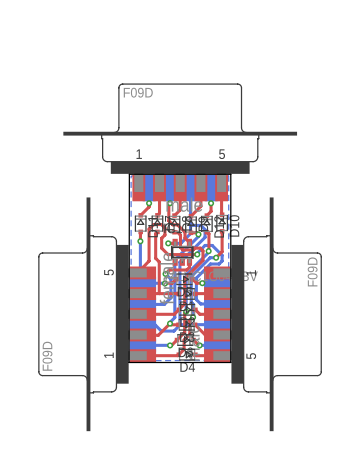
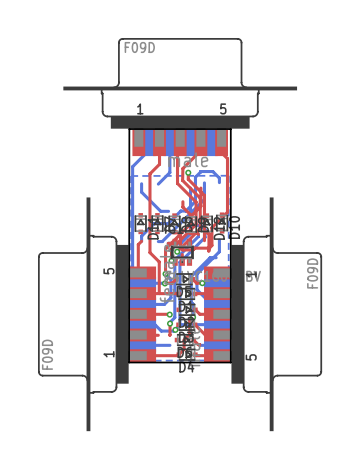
bottom track: none -> (169, 142) (169, 172) (158, 184)
top track: none -> (180, 142) (177, 145) (177, 183) (196, 202) (196, 224) (171, 249) (171, 260)
part position: (180, 142) -> (180, 97)
top track: none -> (200, 142) (198, 152) (182, 168) (182, 180) (200, 198) (200, 228) (177, 251)
top track: none -> (188, 172) (188, 179) (204, 195) (204, 240)
via: none -> (188, 172)
board edge: (230, 174) (129, 174) (129, 362) -> (230, 174) (230, 129) (129, 129) (129, 362)
bottom track: none -> (204, 182) (204, 199) (162, 241) (158, 241)
bottom track: none -> (219, 182) (219, 178) (212, 171) (200, 171) (195, 177) (195, 201) (185, 211) (180, 211) (168, 223) (154, 223) (141, 236) (141, 241)
bottom track: none -> (141, 183) (141, 192) (160, 211) (168, 211)
top track: (159, 188) (159, 213) (157, 215) -> none
top track: (180, 188) (180, 209) (174, 215) -> none
top track: (221, 188) (222, 214) -> none
top track: (149, 203) (149, 206) (140, 215) -> none
via: (149, 203) -> none
top track: (170, 203) (168, 220) (172, 224) (177, 224) (185, 232) (185, 238) (189, 242) -> none
via: (170, 203) -> none
top track: (211, 203) (211, 211) (206, 215) -> none
via: (211, 203) -> none
top track: (140, 231) (140, 241) -> none
top track: (222, 231) (222, 251) (216, 257) -> none
top track: (157, 232) (155, 233) (155, 258) -> (159, 142) (159, 164) (149, 173) (149, 252) (155, 258)
via: (198, 234) -> none
bottom track: (140, 241) (140, 280) -> (149, 142) (145, 146) (145, 153) (132, 166) (132, 273) (140, 280)
via: (140, 241) -> none
top track: none -> (141, 241) (138, 244) (138, 272)
via: (168, 243) -> none
top track: (200, 248) (202, 250) (202, 260) (184, 278) (184, 303) (174, 314) (169, 314) -> (200, 248) (209, 248) (211, 245) (211, 227) (227, 212) (227, 158) (221, 152) (221, 142)
via: none -> (177, 251)
bottom track: (208, 251) (186, 274) (186, 311) -> none
via: (208, 251) -> none
bottom track: (197, 254) (205, 245) (212, 245) (222, 255) (222, 261) (219, 264) (210, 264) (196, 278) (196, 299) (200, 303) (217, 303) -> (219, 240) (219, 251) (196, 274) (196, 289) (211, 303) (217, 303)
top track: (197, 254) (168, 254) (161, 248) (161, 238) (164, 234) (164, 228) (161, 224) (153, 224) (149, 229) (149, 261) (143, 267) (142, 272) -> none
via: (197, 254) -> none
via: (216, 257) -> none
via: none -> (171, 260)
top track: (189, 262) (189, 267) (186, 270) (169, 270) (165, 273) -> (182, 201) (182, 207) (191, 215) (191, 223) (165, 249) (165, 273)
top track: (186, 311) (184, 332) (170, 345) -> none
via: (186, 311) -> none
via: none -> (169, 314)
top track: none -> (170, 323) (169, 335)
top track: (178, 324) (170, 323) (158, 335) -> none
via: none -> (175, 329)
via: (170, 345) -> none
via: (199, 345) -> none

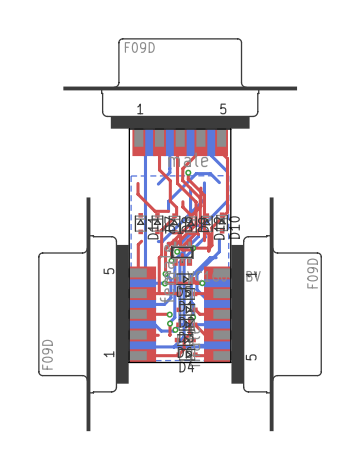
bottom track: none -> (211, 142) (211, 155) (227, 171) (227, 200) (184, 245) (184, 336) (173, 346)
bottom track: (145, 153) (132, 166) (132, 273) (142, 283) -> (145, 153) (145, 280)
top track: (159, 164) (149, 173) (149, 252) (159, 261) -> (159, 164) (159, 169) (170, 180) (170, 201) (176, 207) (176, 215) (161, 230) (161, 255) (159, 261)
bottom track: (219, 182) (219, 178) (212, 171) (200, 171) (195, 177) (195, 201) (185, 211) (180, 211) (168, 223) (154, 223) (141, 236) (141, 241) -> (219, 182) (210, 173) (196, 173) (168, 201) (168, 211)
top track: none -> (138, 183) (138, 194) (155, 211) (168, 211)
bottom track: (141, 183) (141, 192) (160, 211) (168, 211) -> none
via: none -> (193, 248)
top track: (176, 279) (172, 283) (165, 283) -> (202, 282) (165, 283)
top track: (193, 340) (199, 345) -> none
bottom track: (142, 345) (169, 345) -> (142, 345) (144, 346) (214, 346) (215, 345)

